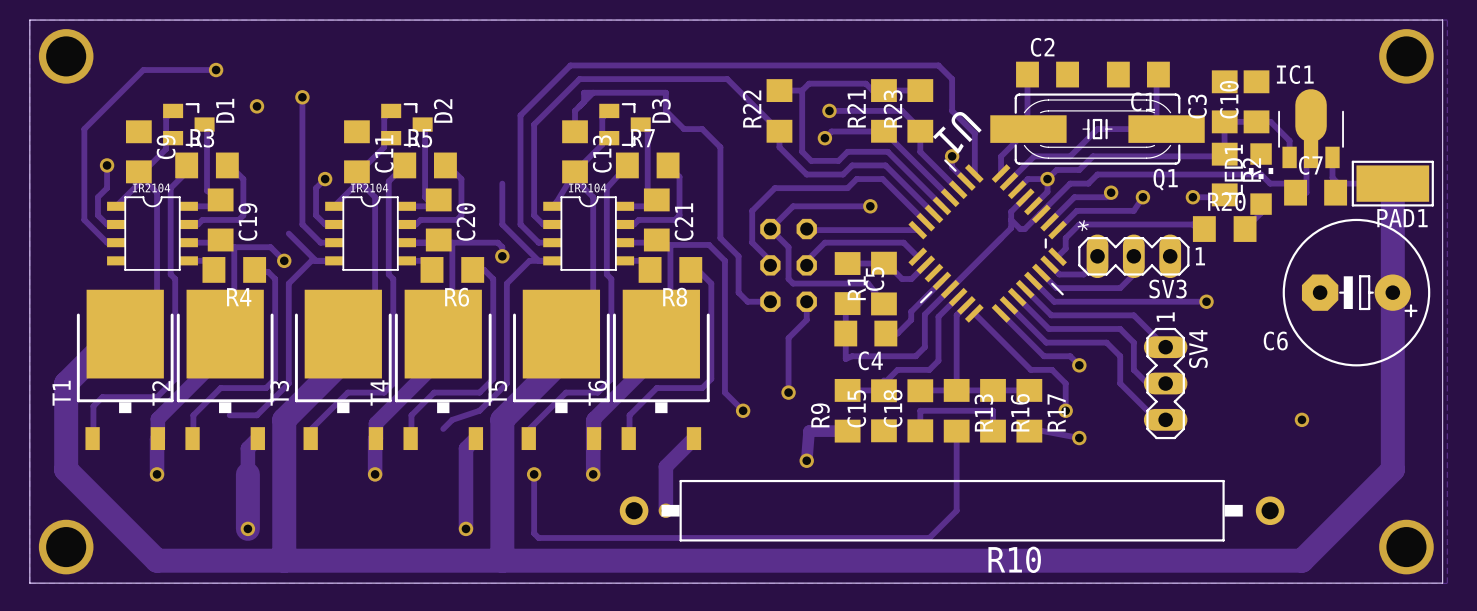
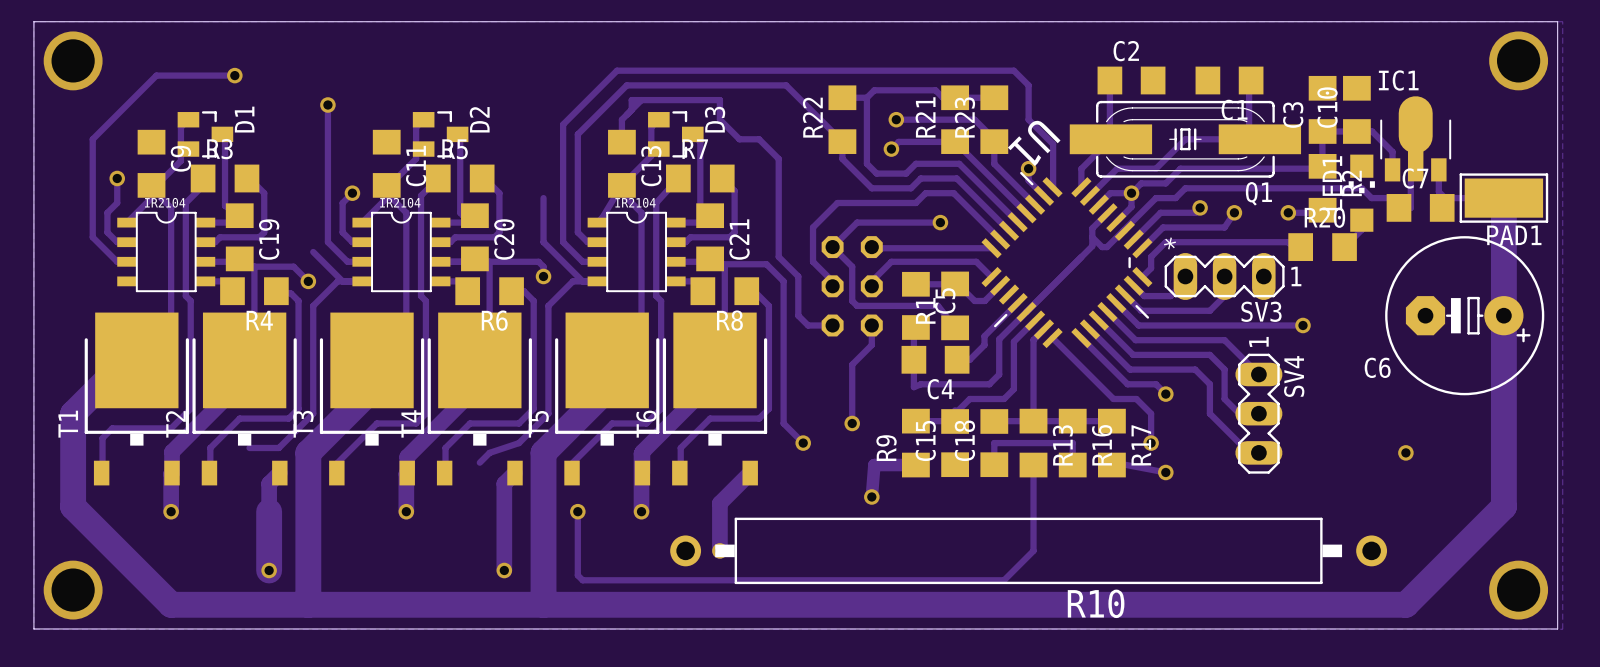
via: (256, 106) -> none

